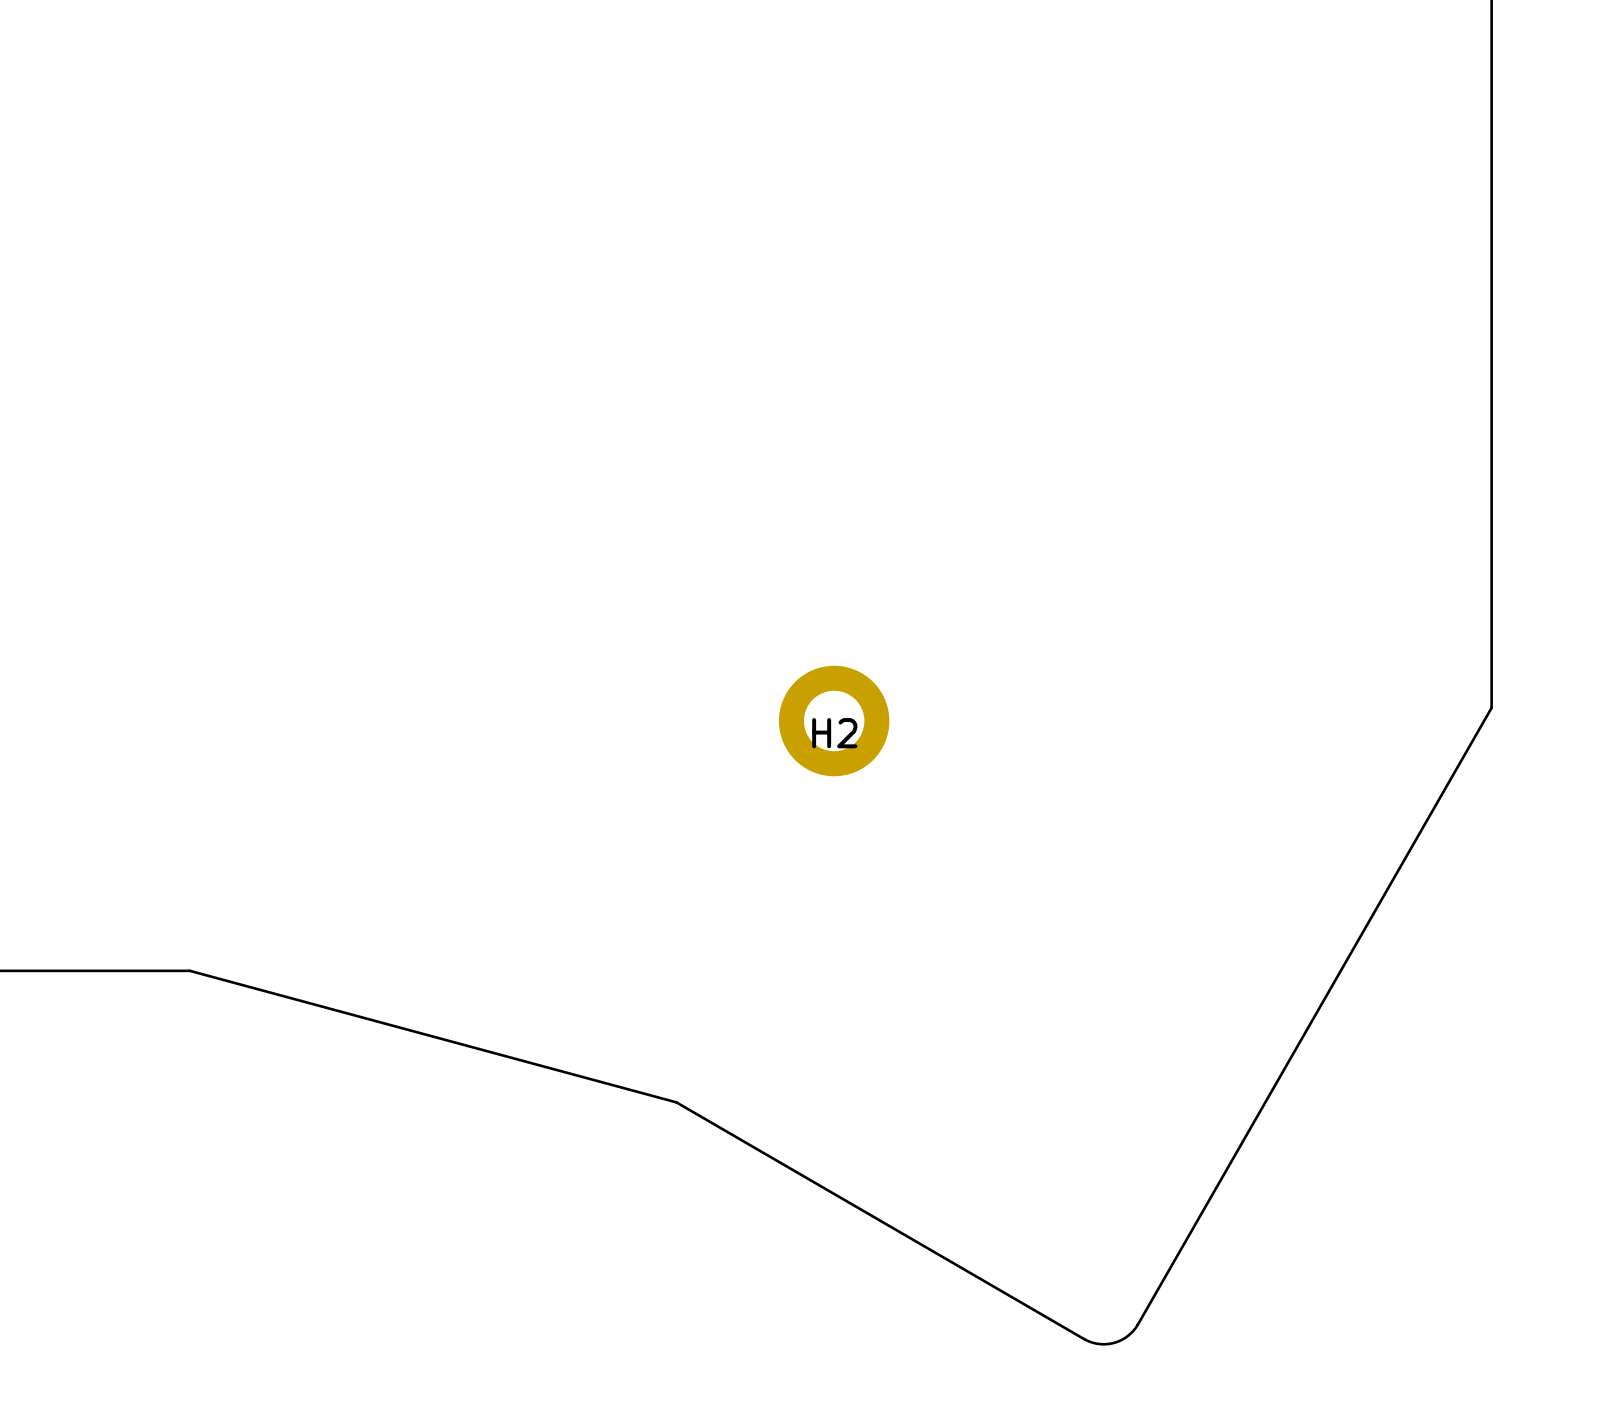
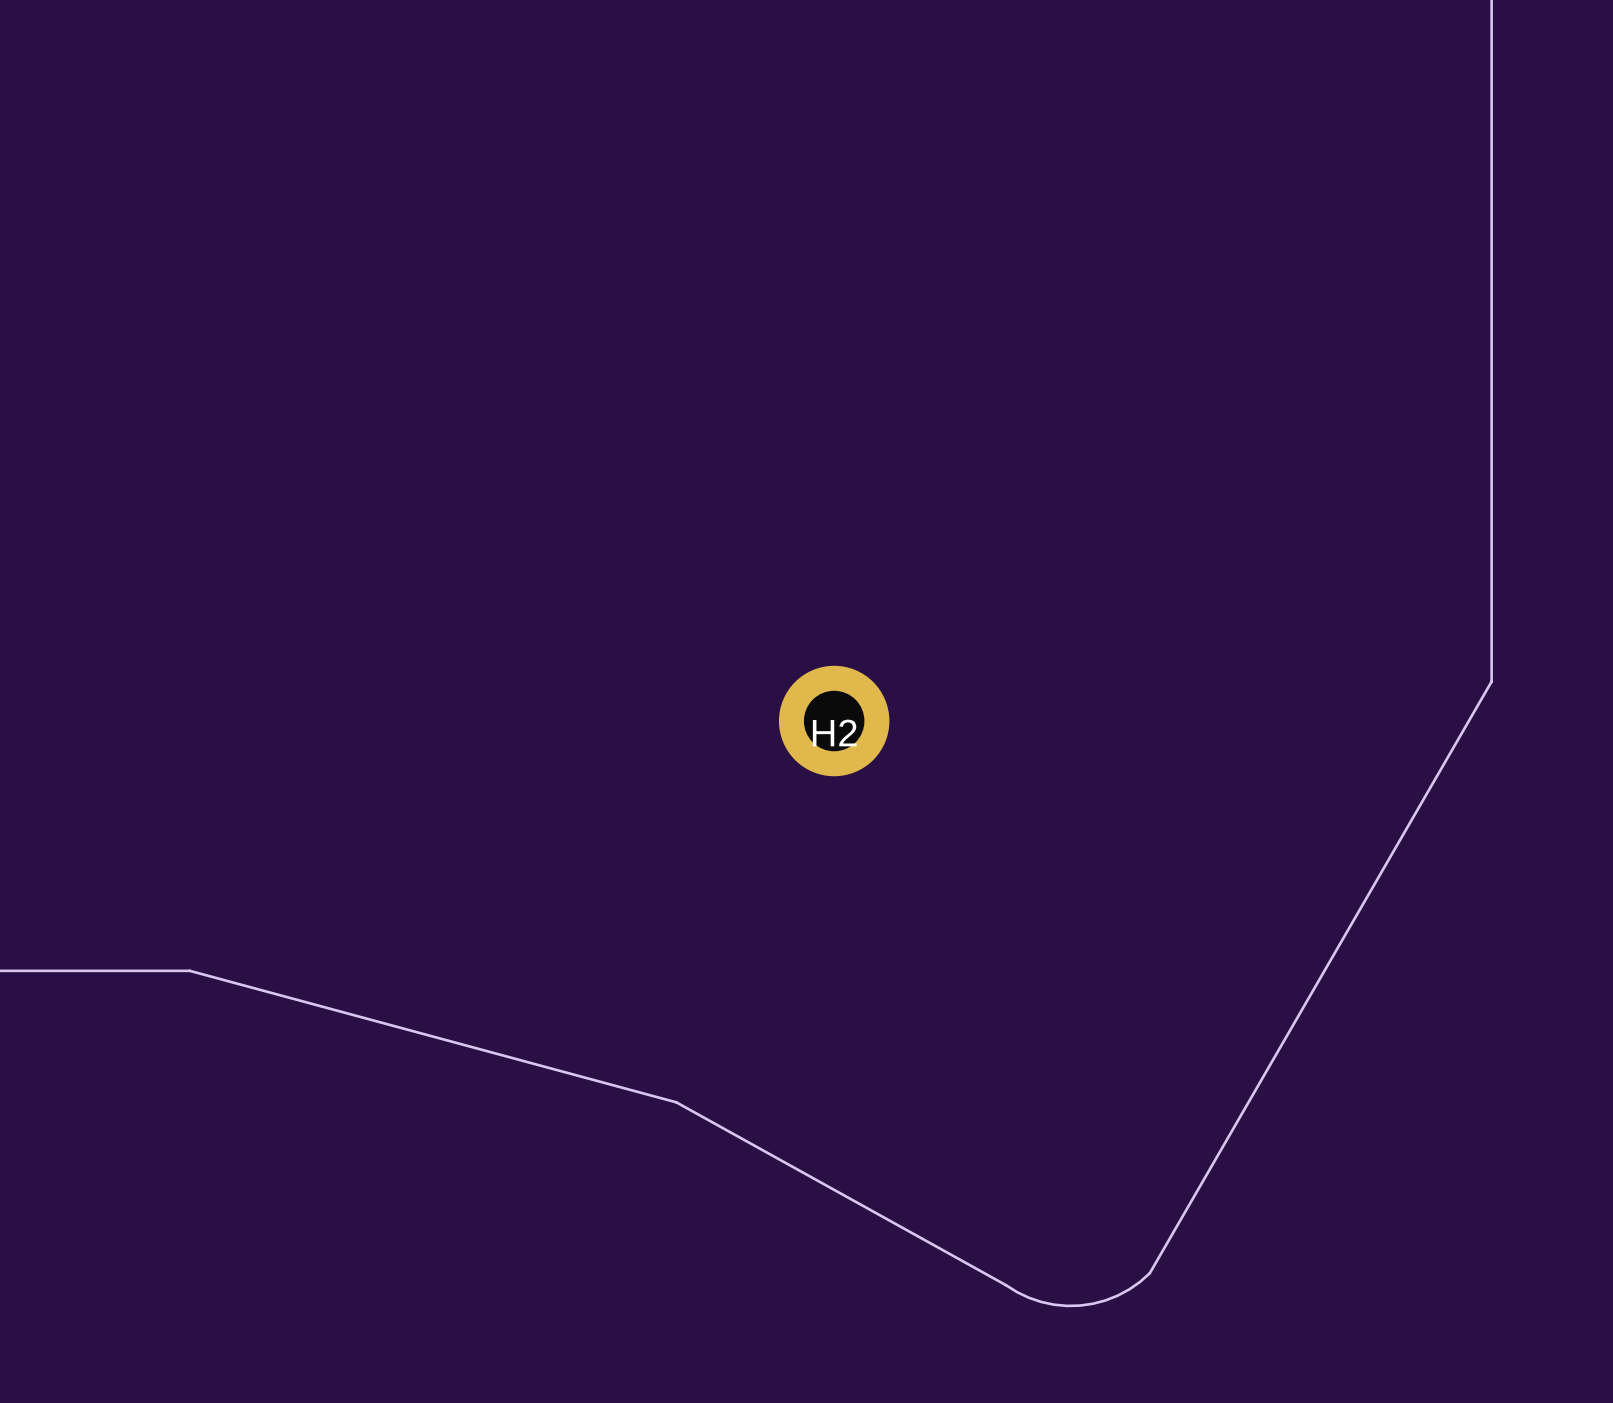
board edge: (1491, 681) (1491, 707) (1137, 1324) (1122, 1339) (1100, 1344) (1084, 1339) (676, 1102) -> (1491, 681) (1149, 1273) (1129, 1289) (1117, 1295) (1092, 1303) (1067, 1305) (1041, 1301) (1028, 1297) (676, 1102)

